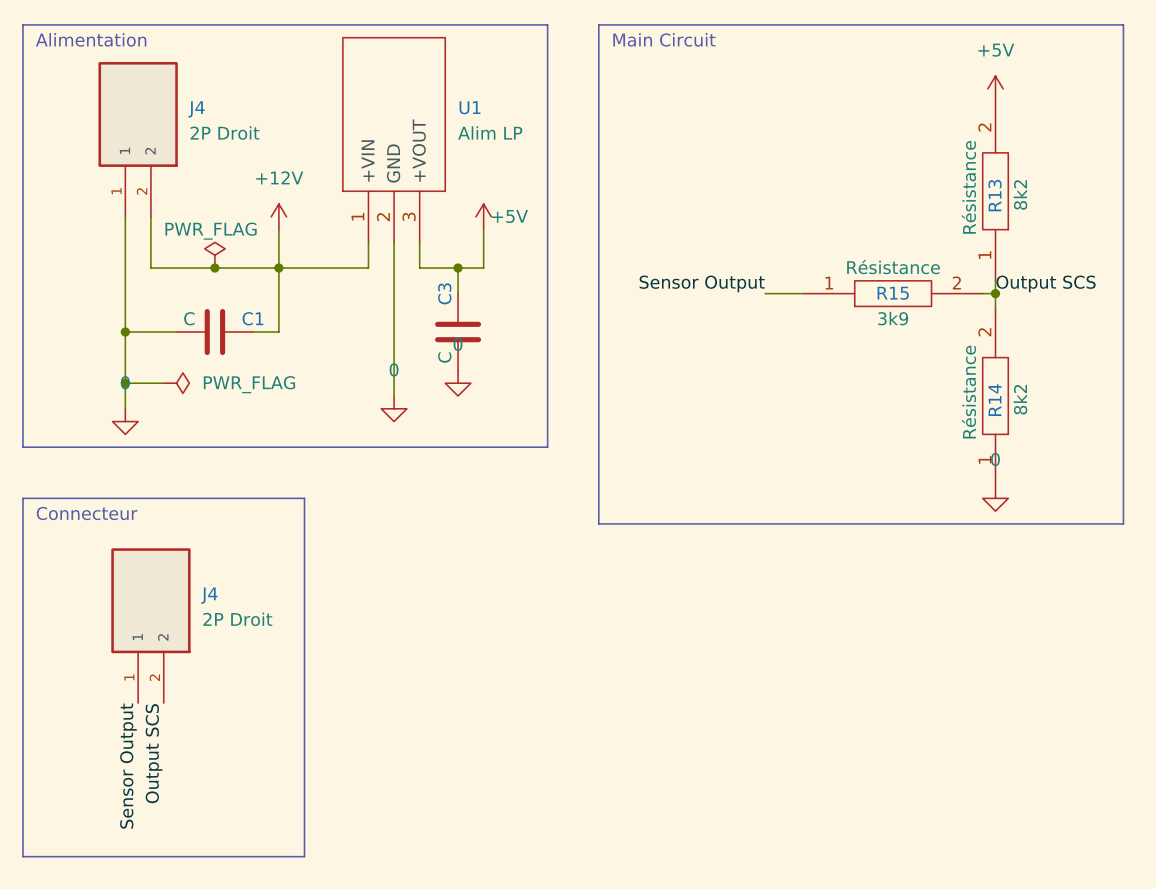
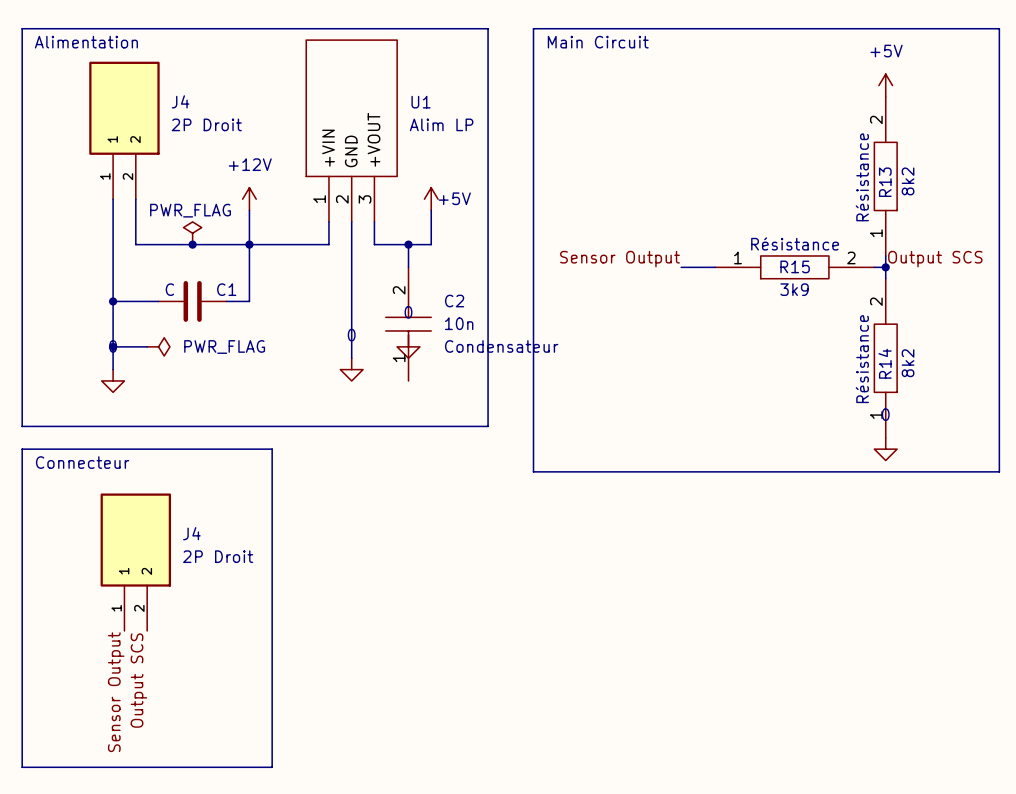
C3: C (458, 332) -> none
C2: none -> 10n (408, 324)
line: (22, 447) (547, 447) -> (22, 403) (22, 426) (488, 426) (488, 403)

